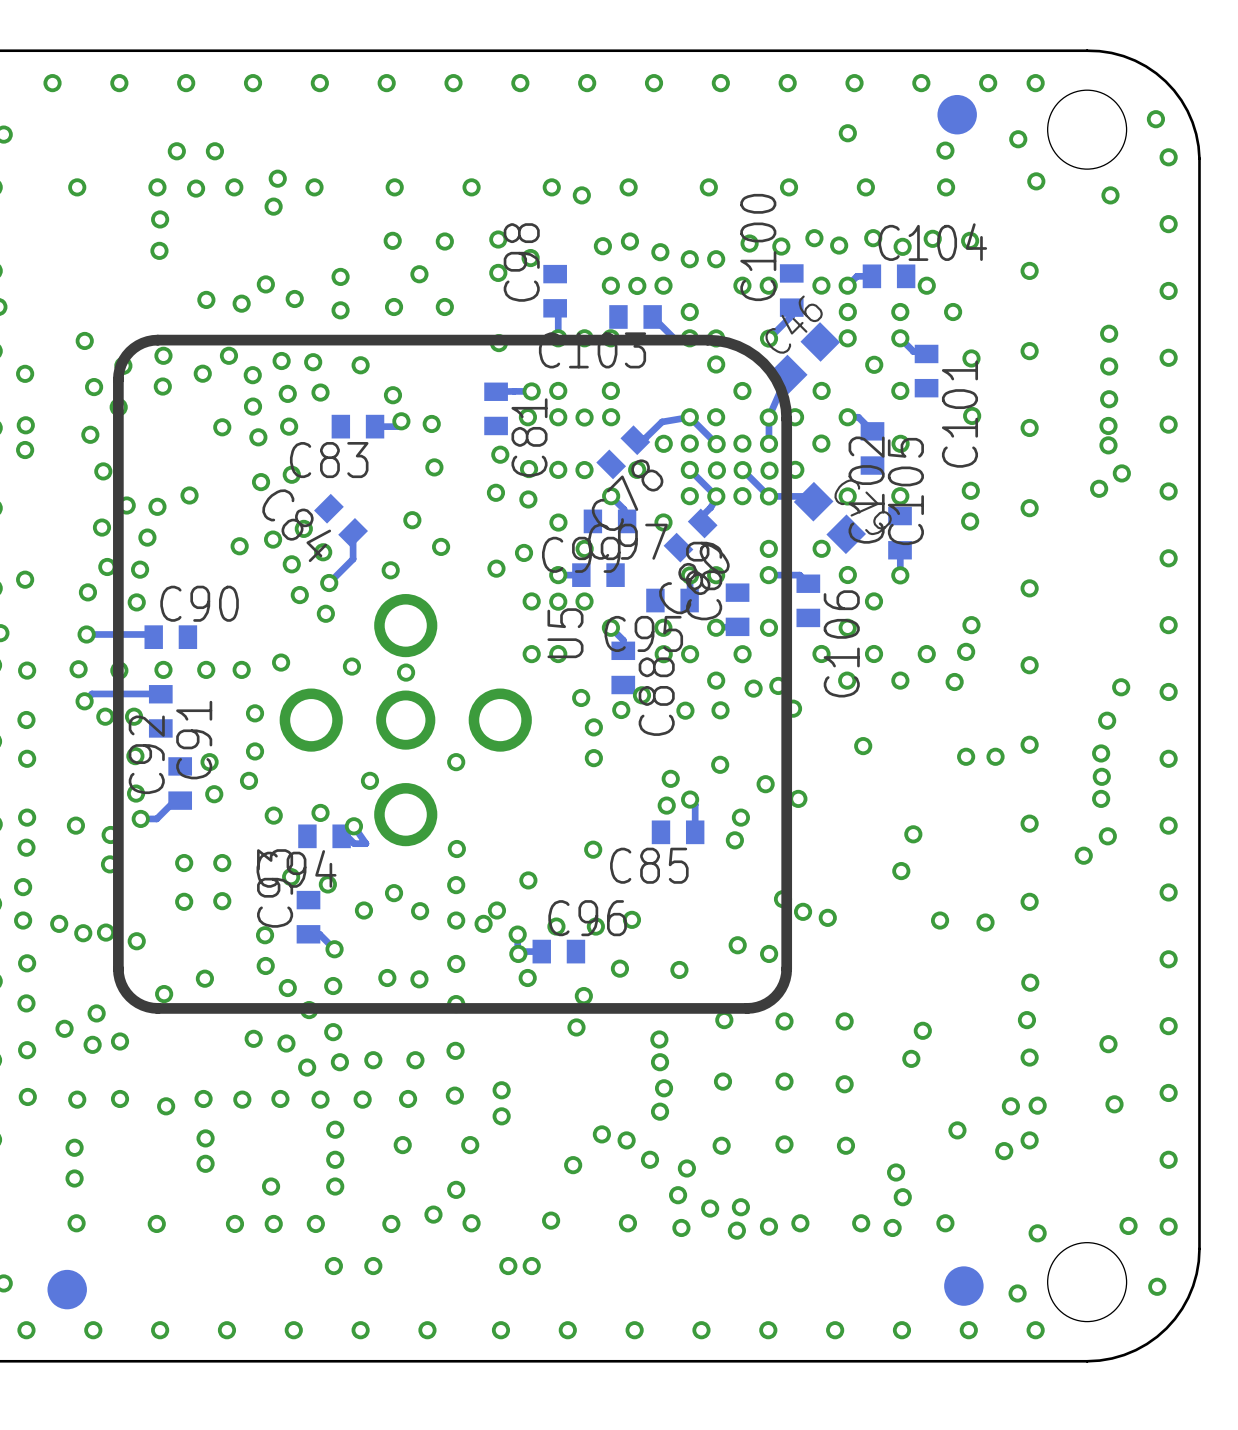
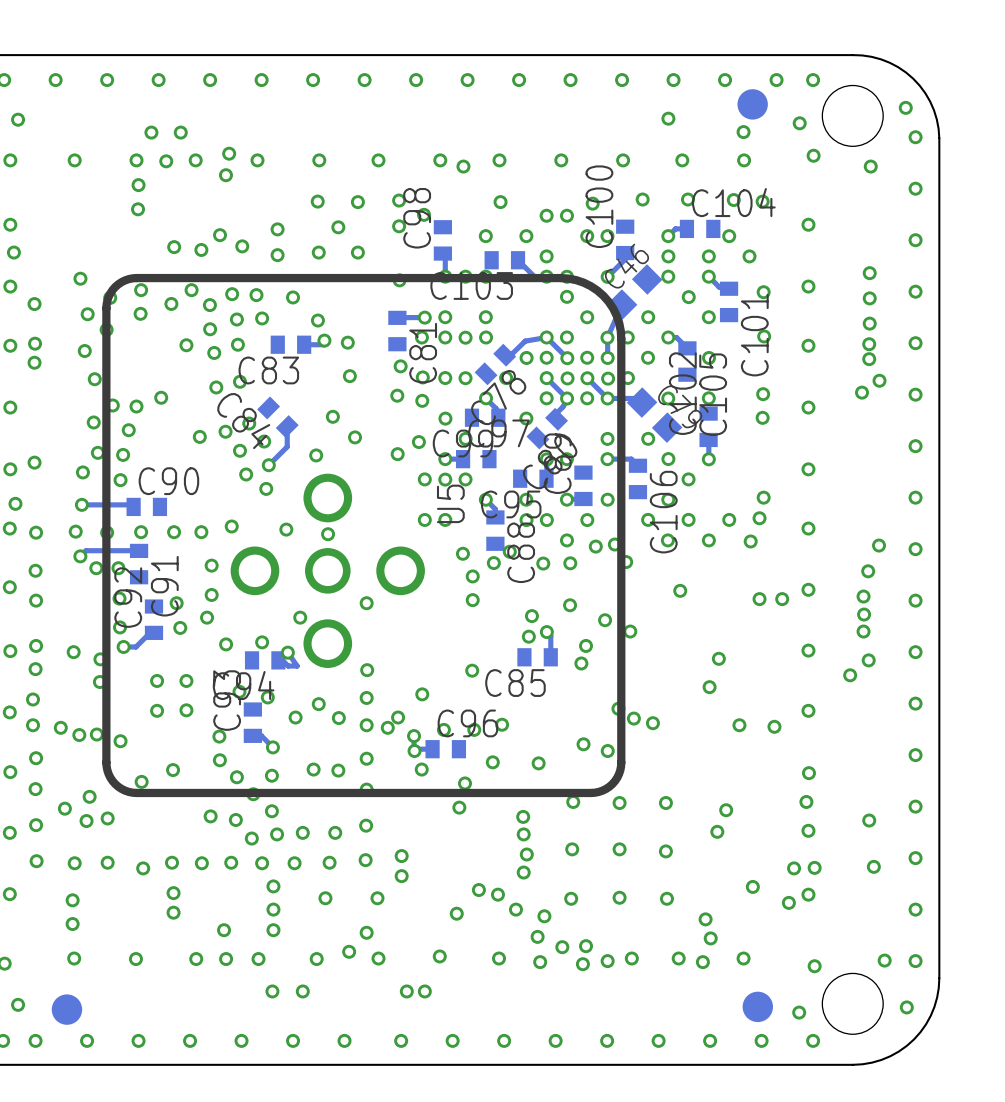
via: (839, 245) -> none
via: (602, 246) -> none
via: (781, 246) -> none
via: (902, 246) -> none
via: (660, 252) -> none
via: (637, 285) -> none
via: (821, 285) -> none

